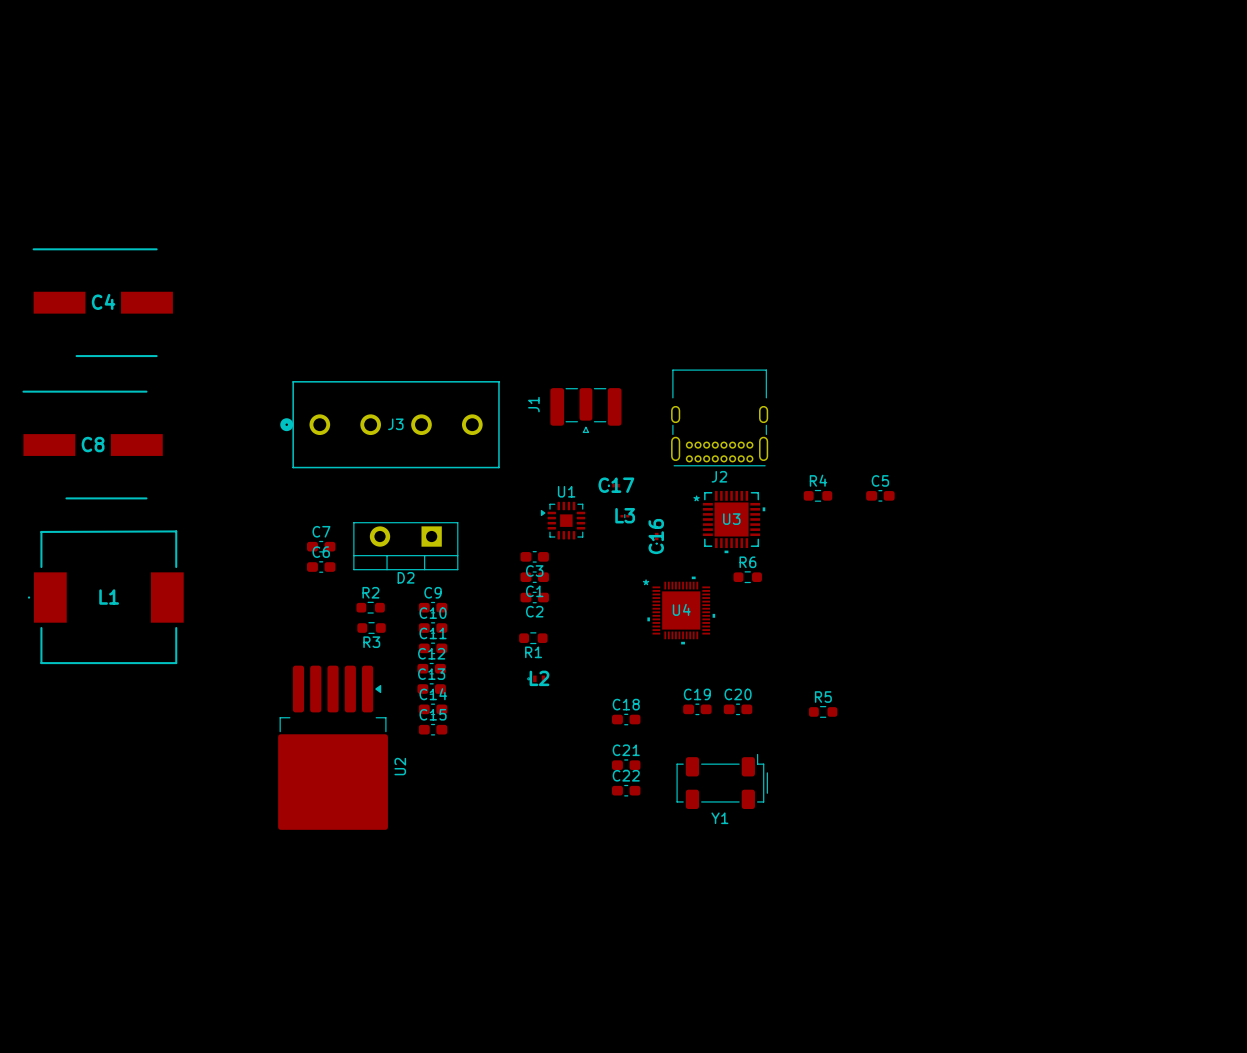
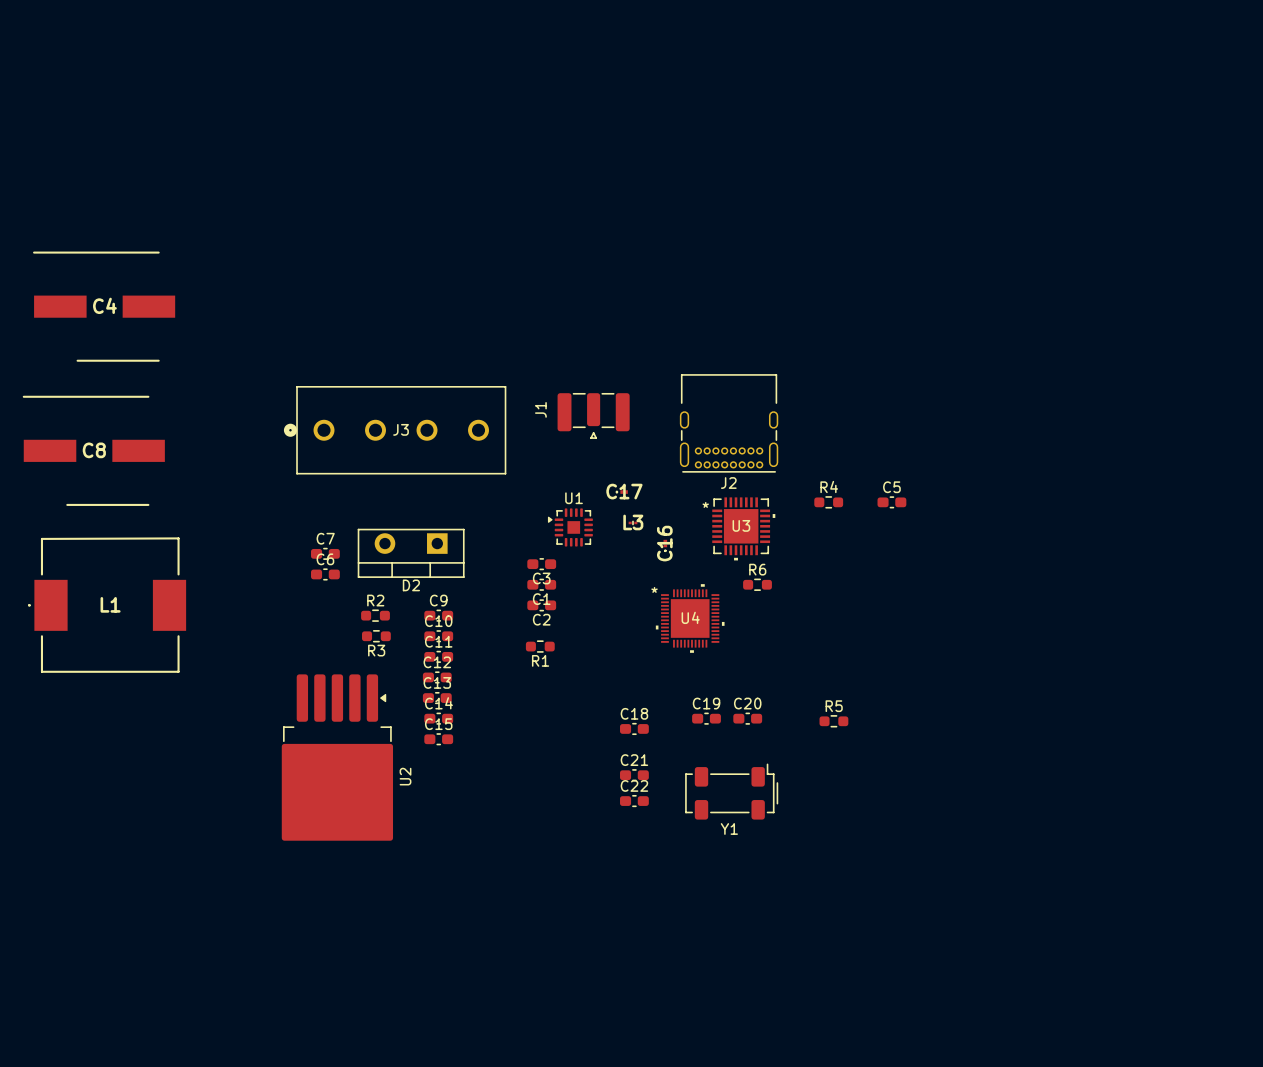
L2: (536, 678) -> none

